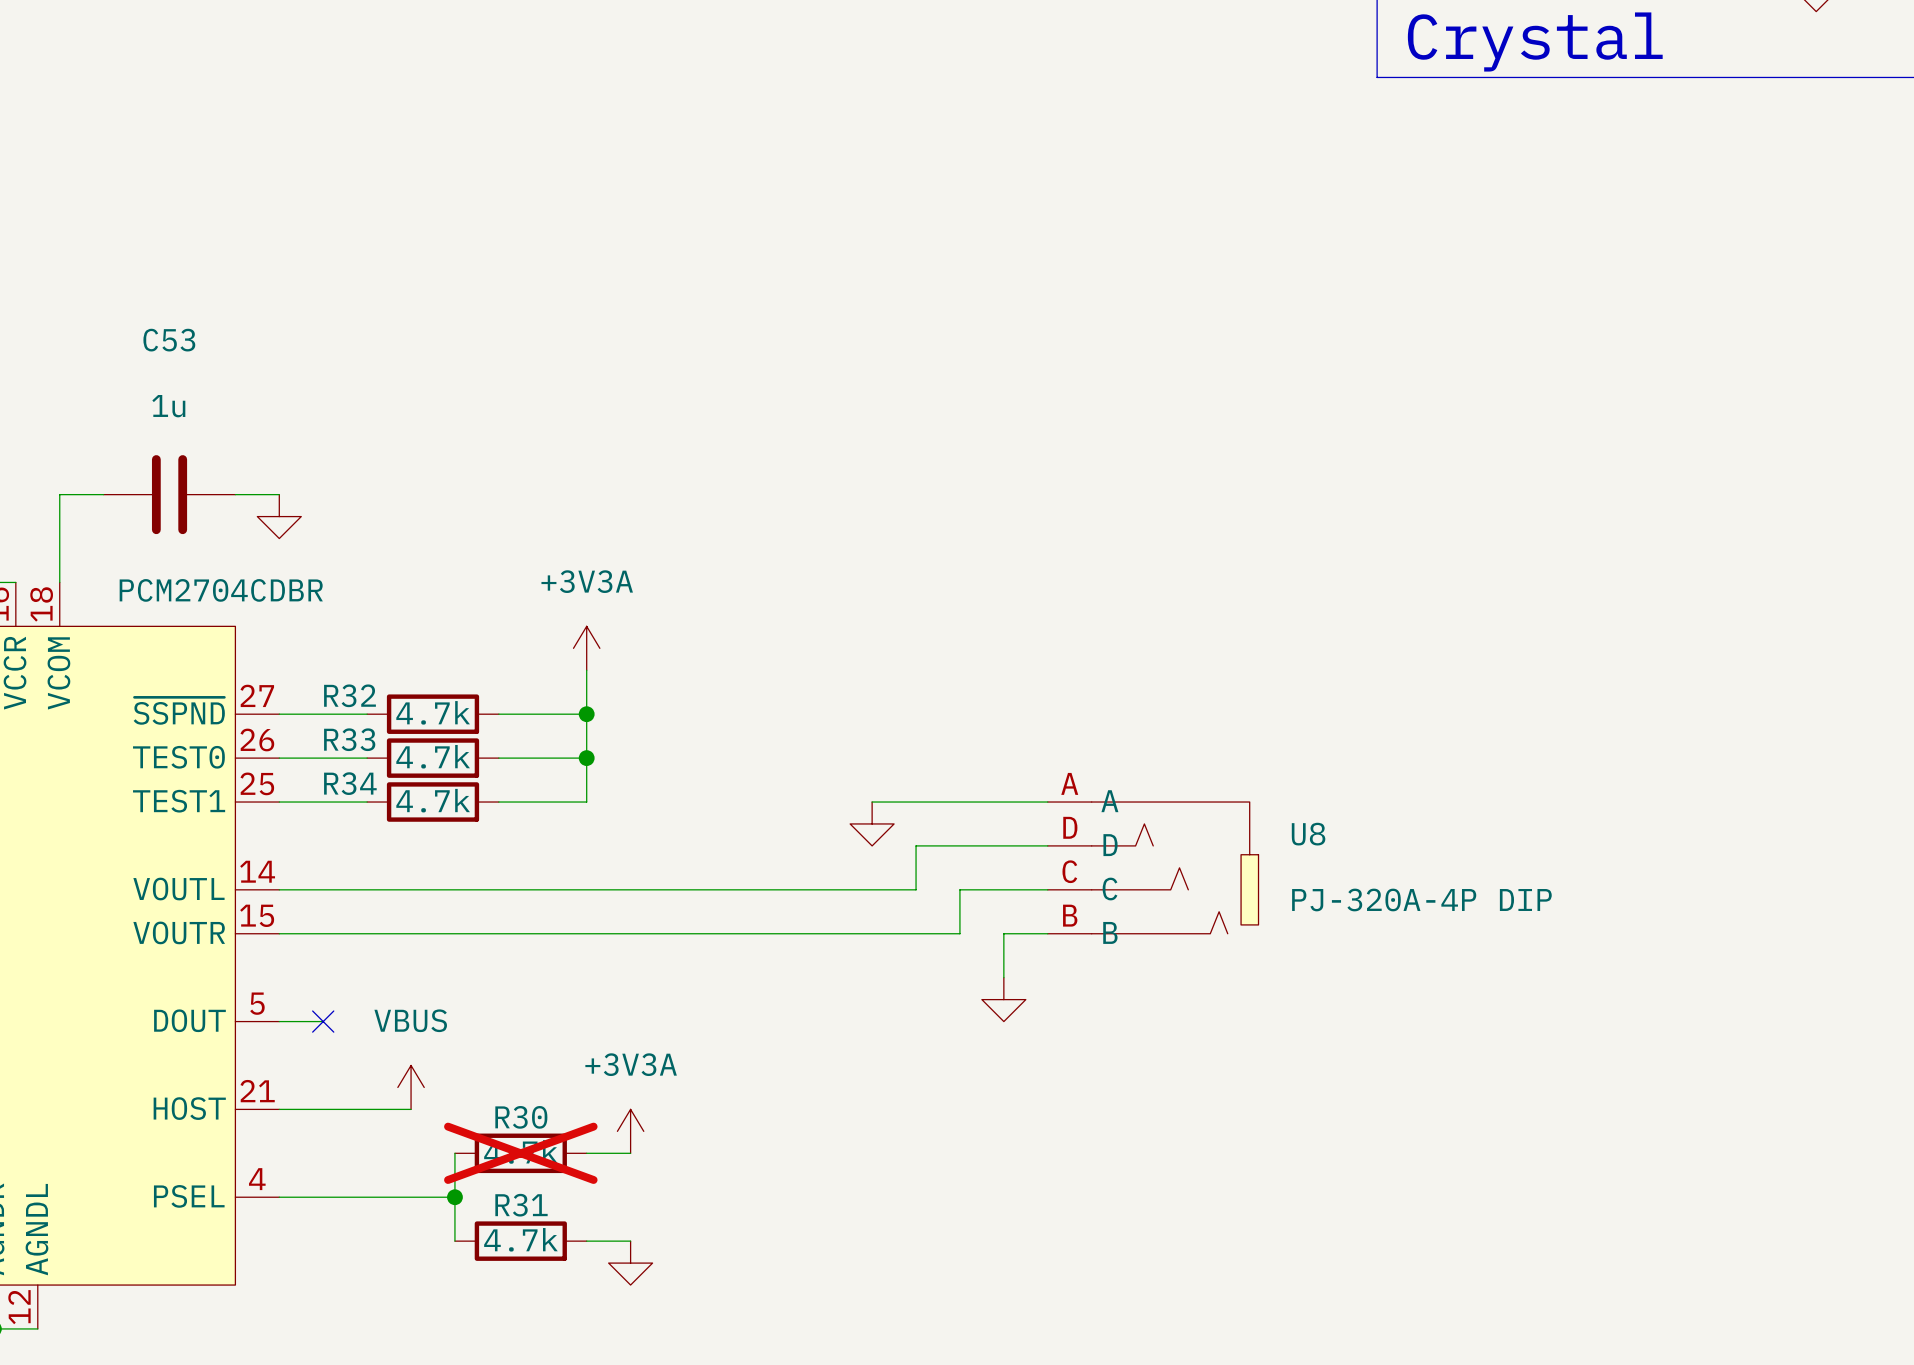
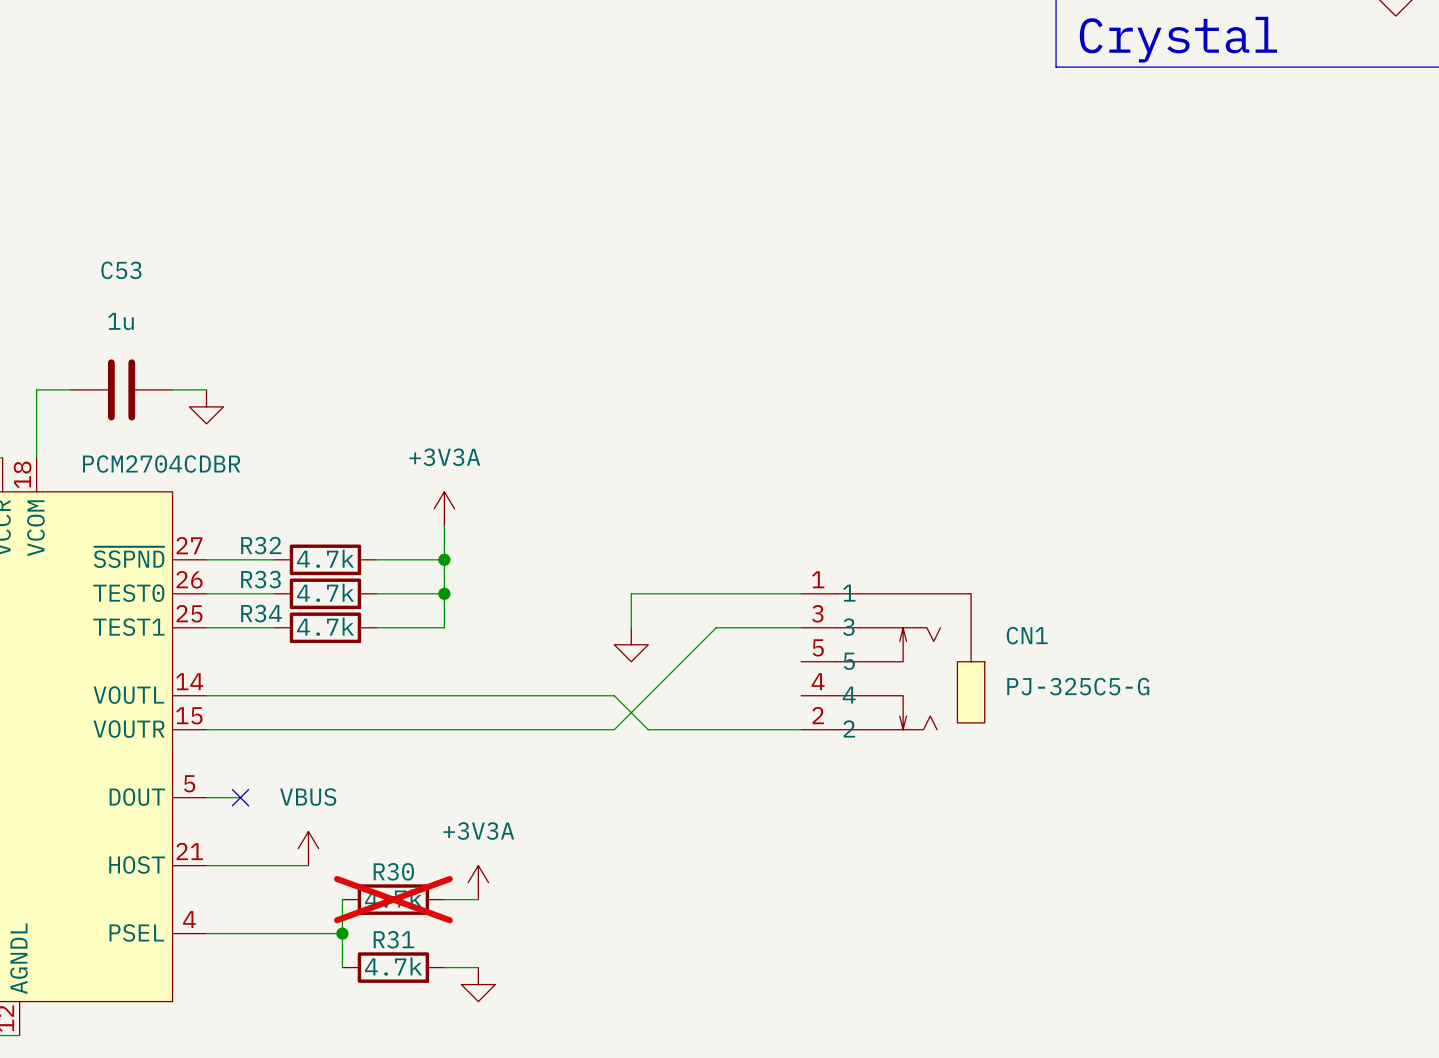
wire: none -> (801, 593) (631, 593) (631, 627)
wire: (872, 802) (937, 802) -> (614, 729) (716, 627)
power symbol position: (872, 823) -> (631, 644)
wire: (1047, 845) (916, 845) (916, 889) (806, 889) -> none
CN1: none -> PJ-325C5-G (892, 661)
U8: PJ-320A-4P DIP (1153, 867) -> none
wire: (1047, 889) (959, 889) (959, 933) -> (767, 729) (733, 729)
wire: (806, 933) (850, 933) -> (614, 695) (648, 729)
wire: (1003, 933) (1003, 977) -> none
power symbol: (1003, 999) -> none

